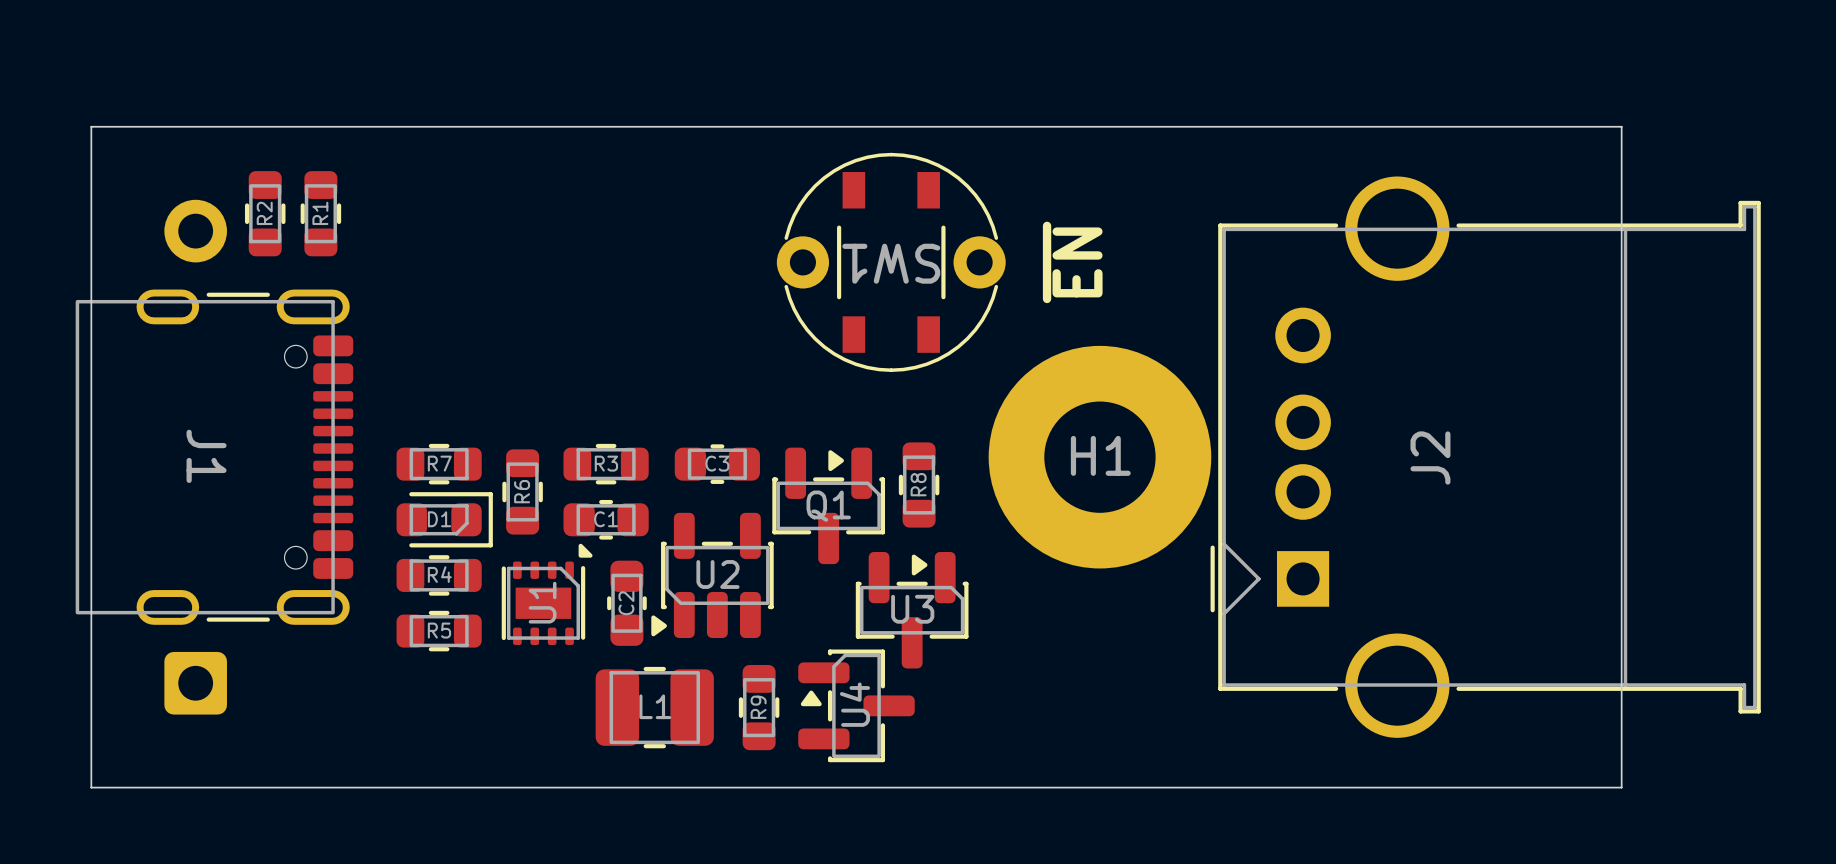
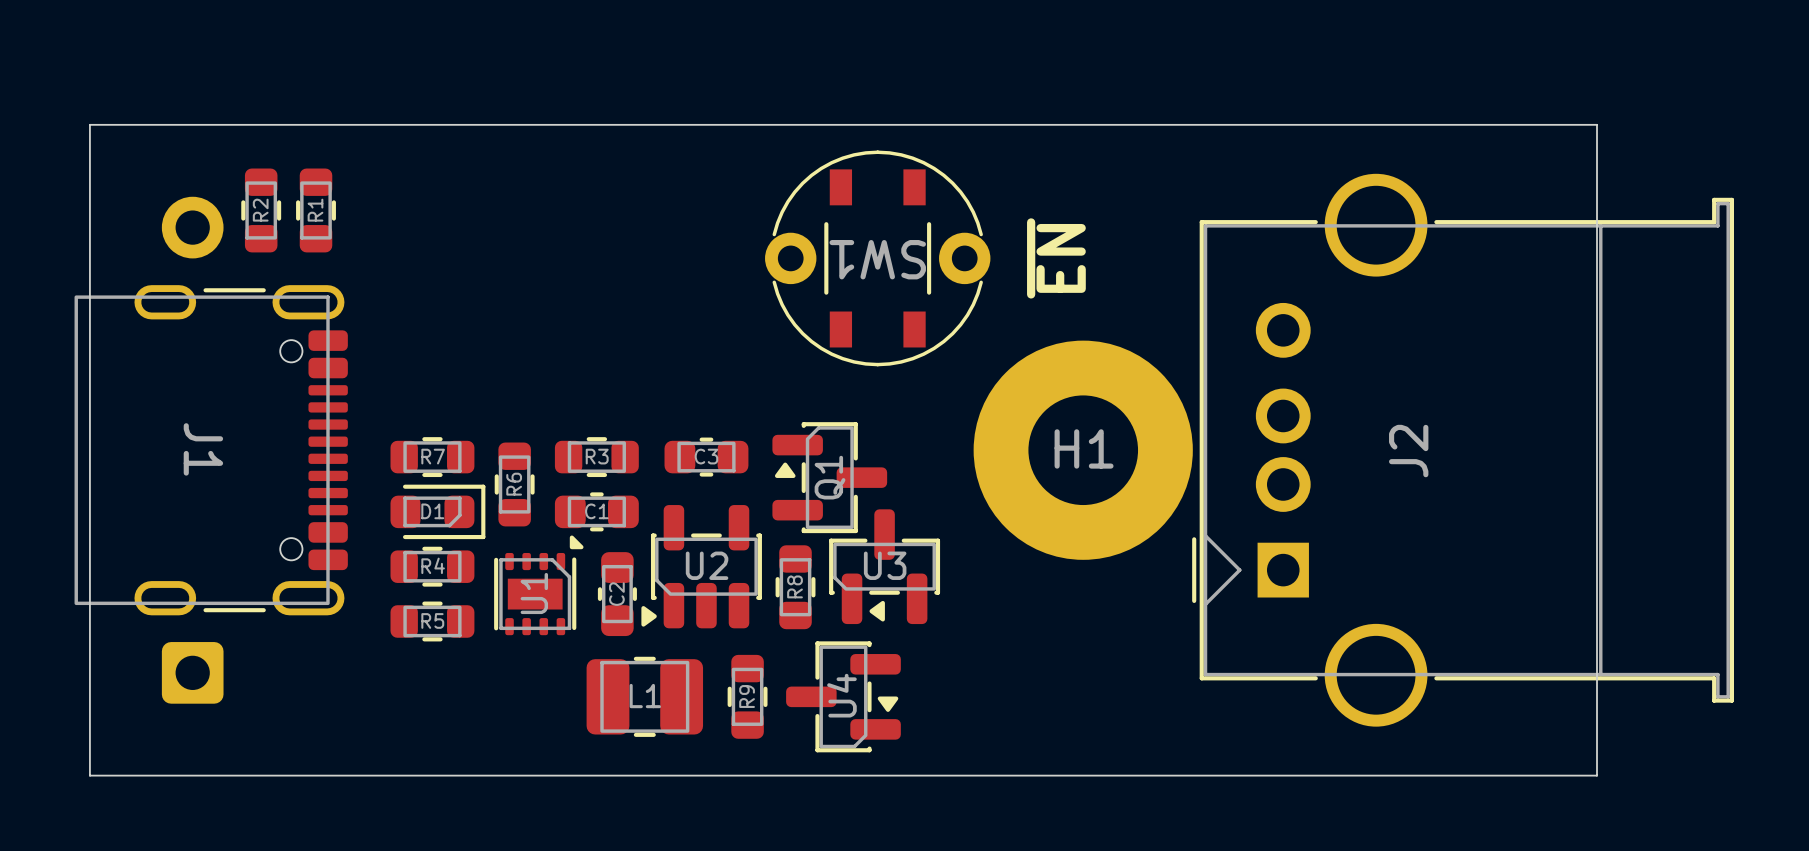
R8 position: (919, 485) -> (795, 587)
Q1 rotation: 0° (828, 505) -> 90° counterclockwise (829, 477)
U3 rotation: 0° (912, 610) -> 180° (884, 566)
U4 rotation: 0° (856, 705) -> 180° (843, 696)

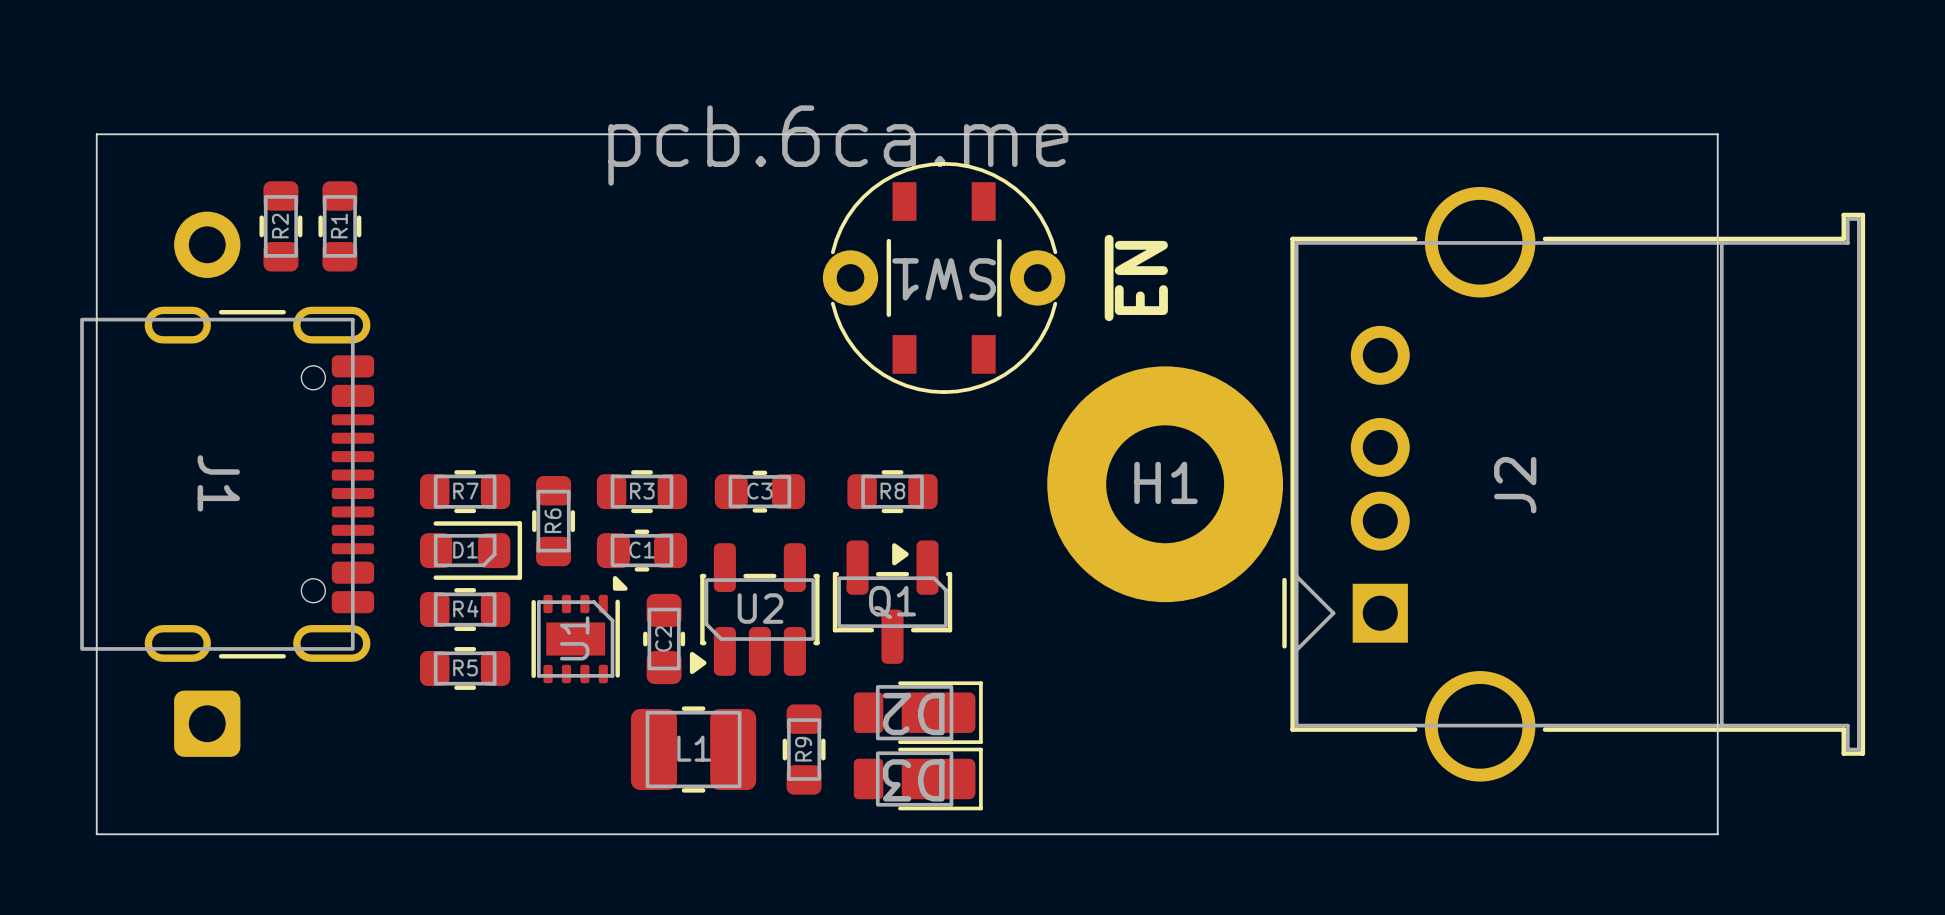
drawing: none -> [608, 105, 1069, 186]
Q1 rotation: 0° (829, 477) -> 90° clockwise (892, 602)
Q1 position: (829, 477) -> (892, 602)
U3: (884, 566) -> none
R8 rotation: 0° (795, 587) -> 90° clockwise (892, 491)
R8 position: (795, 587) -> (892, 491)
D2: none -> (918, 712)
U4: (843, 696) -> none
D3: none -> (918, 779)

